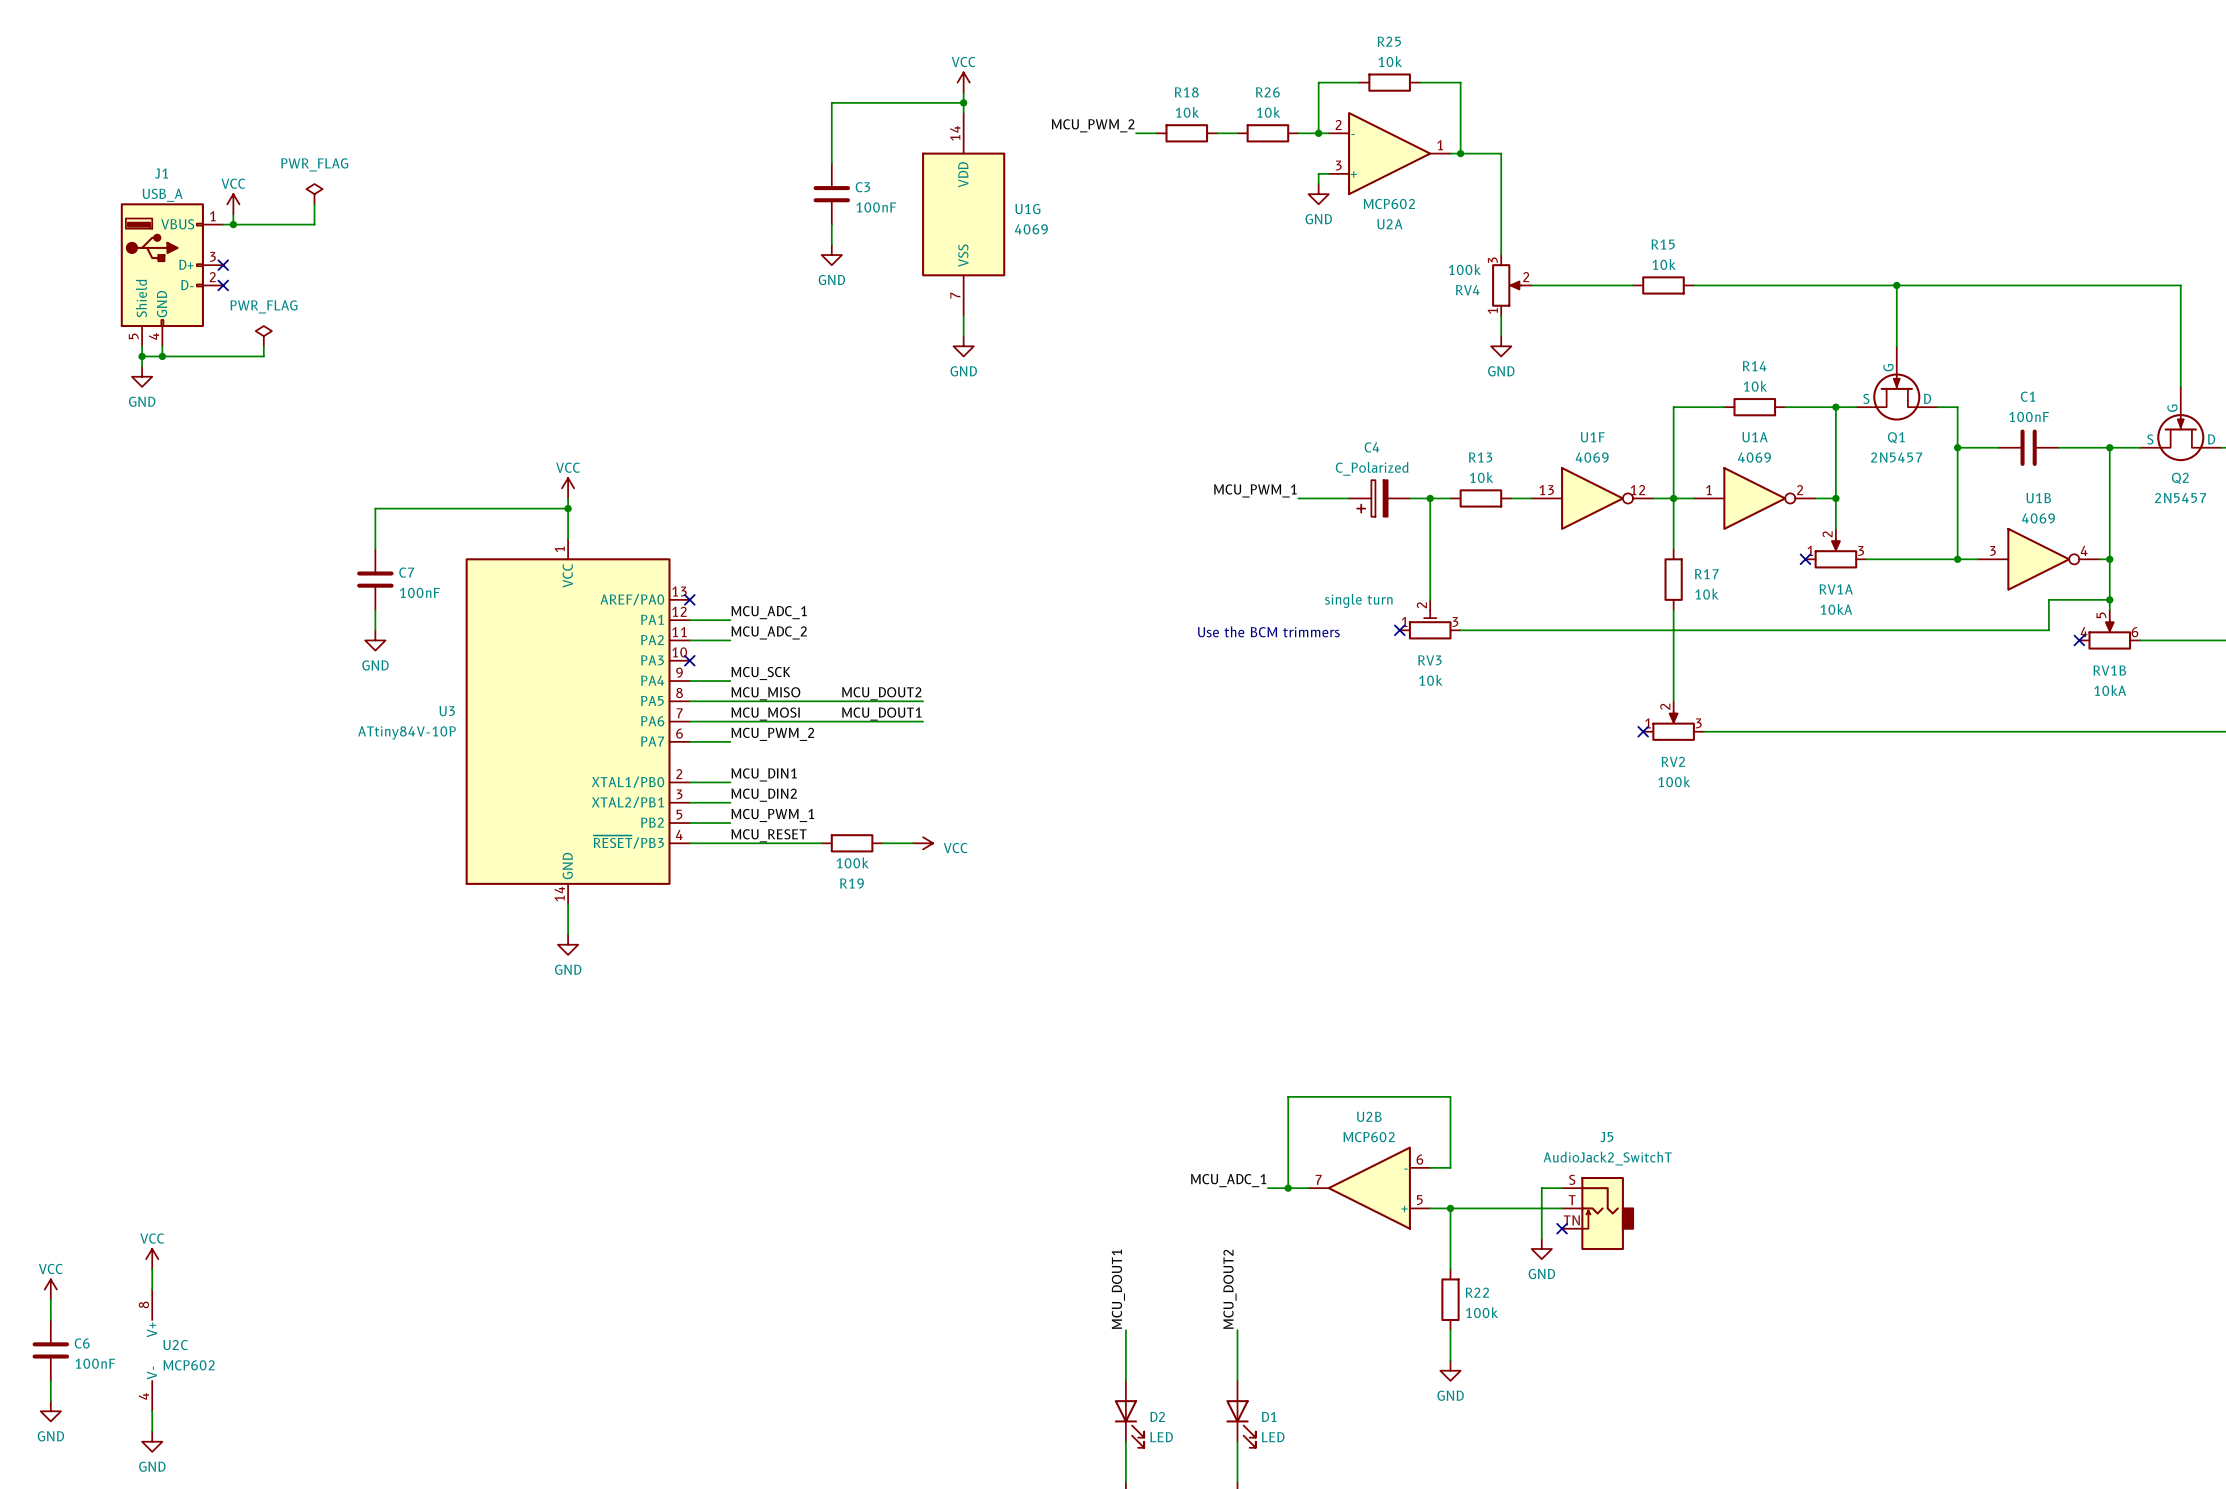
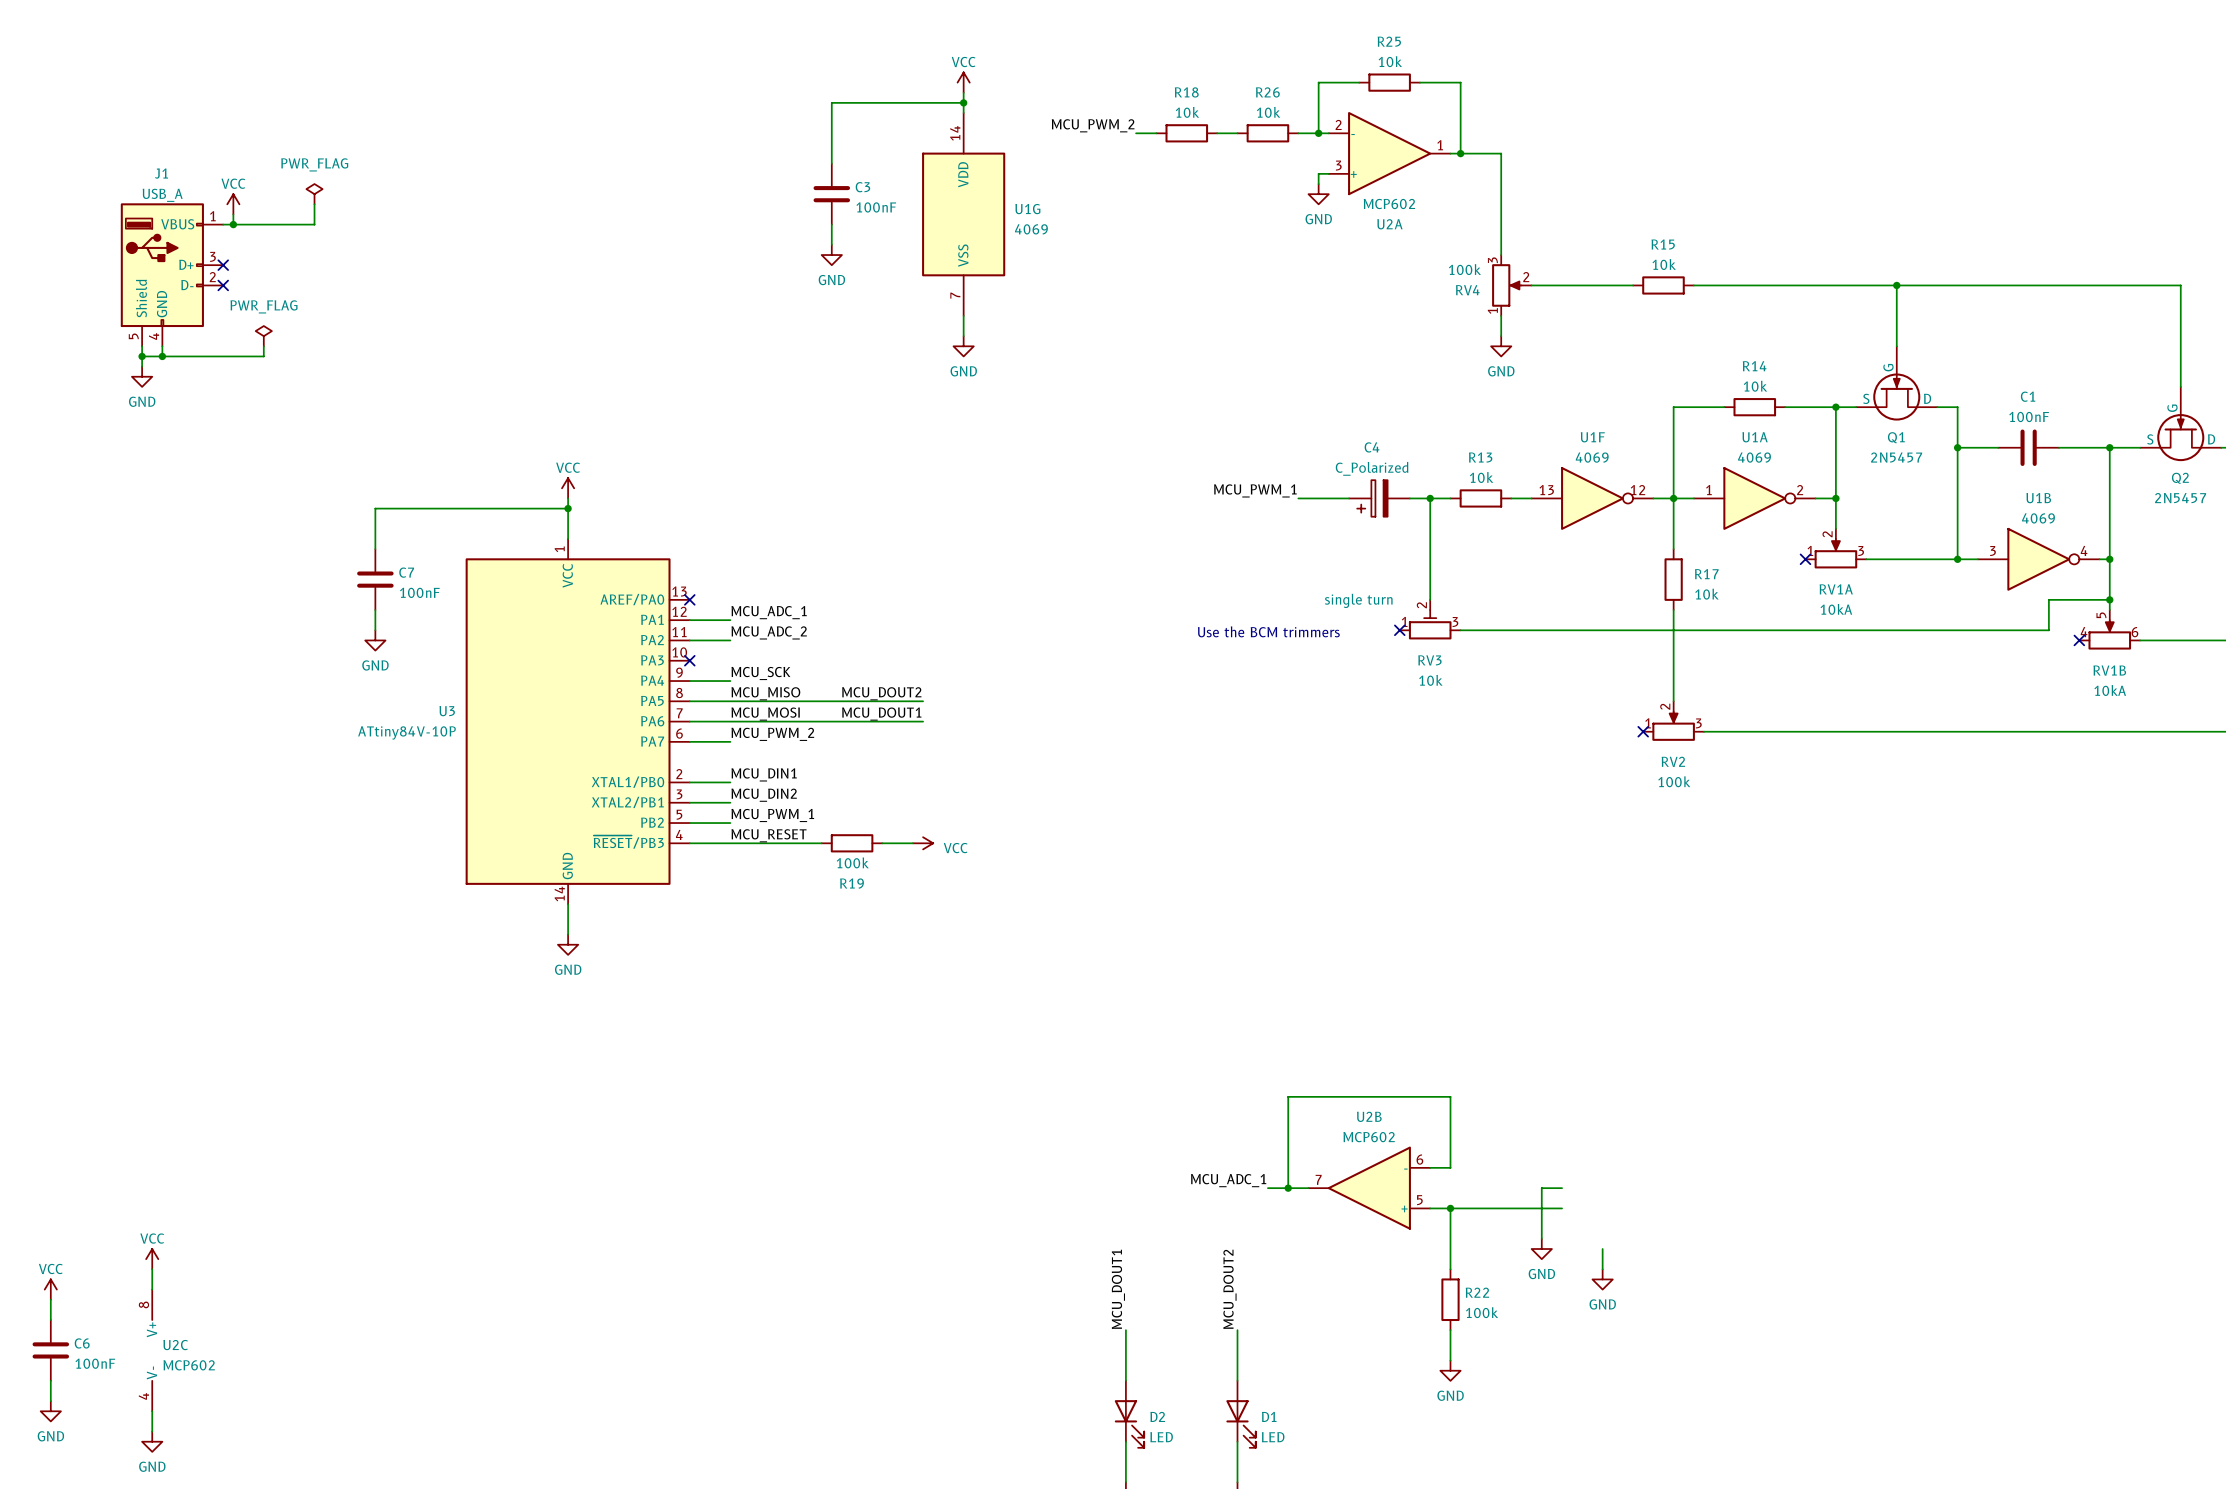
J5: AudioJack2_SwitchT (1598, 1213) -> none
no-connect mark: (1562, 1228) -> none
wire: none -> (1602, 1249) (1602, 1269)
power symbol: none -> GND (1602, 1279)

